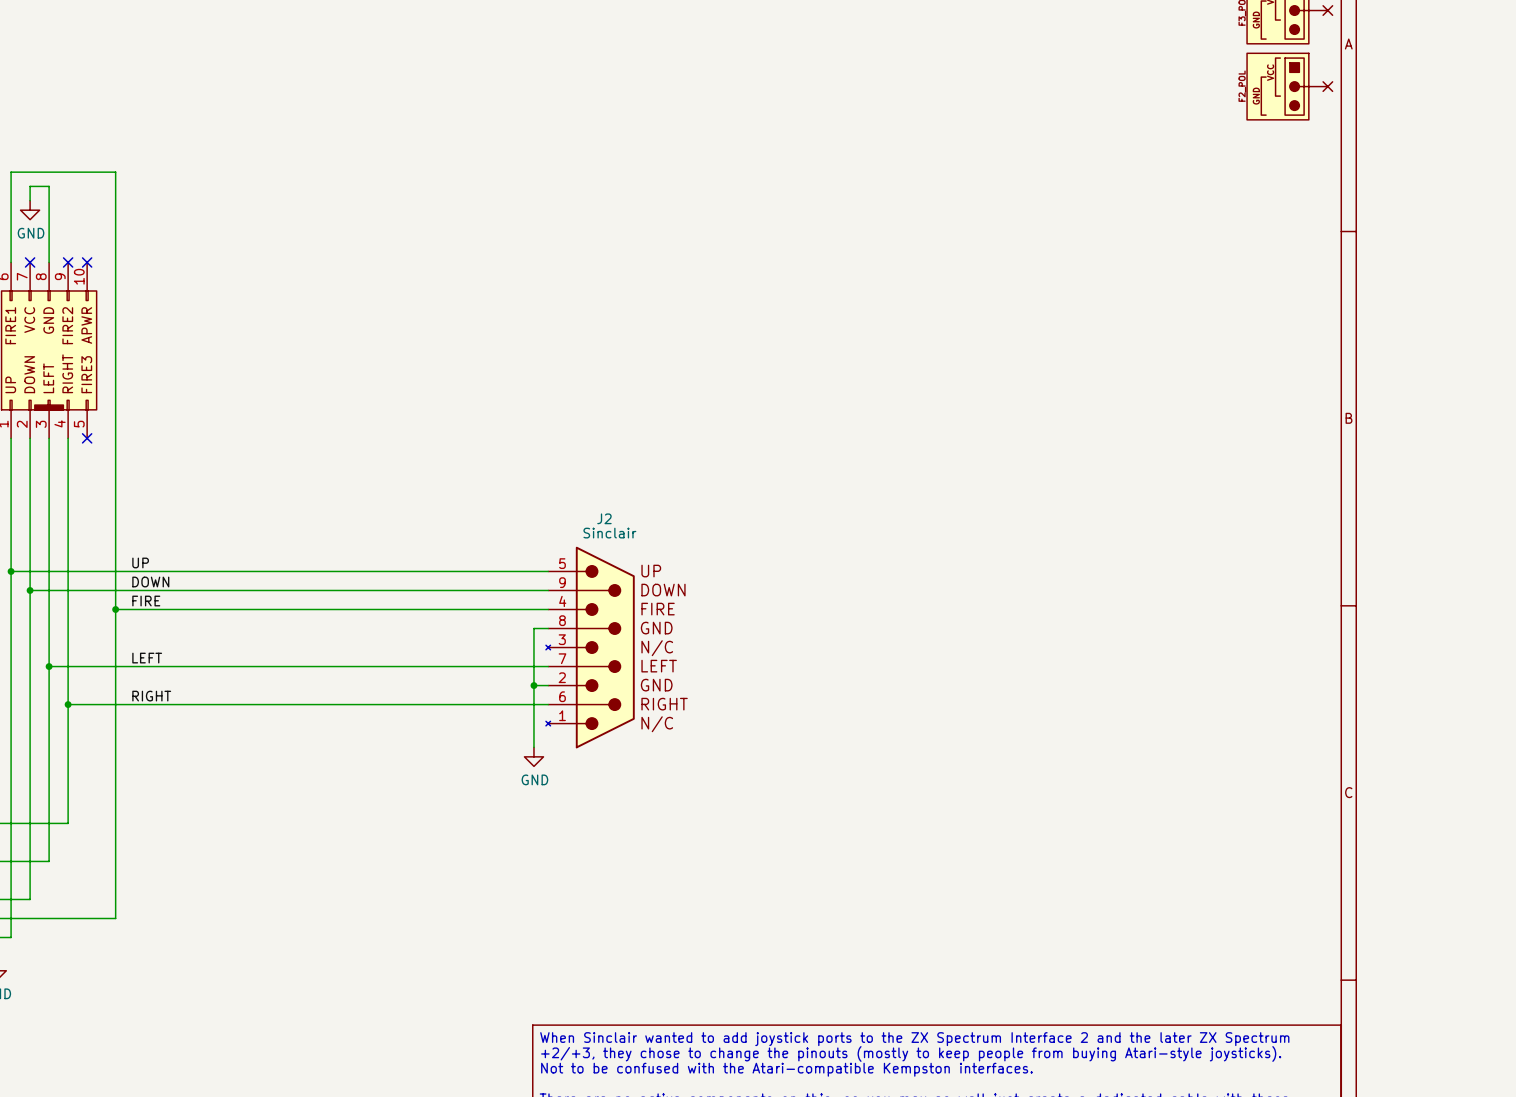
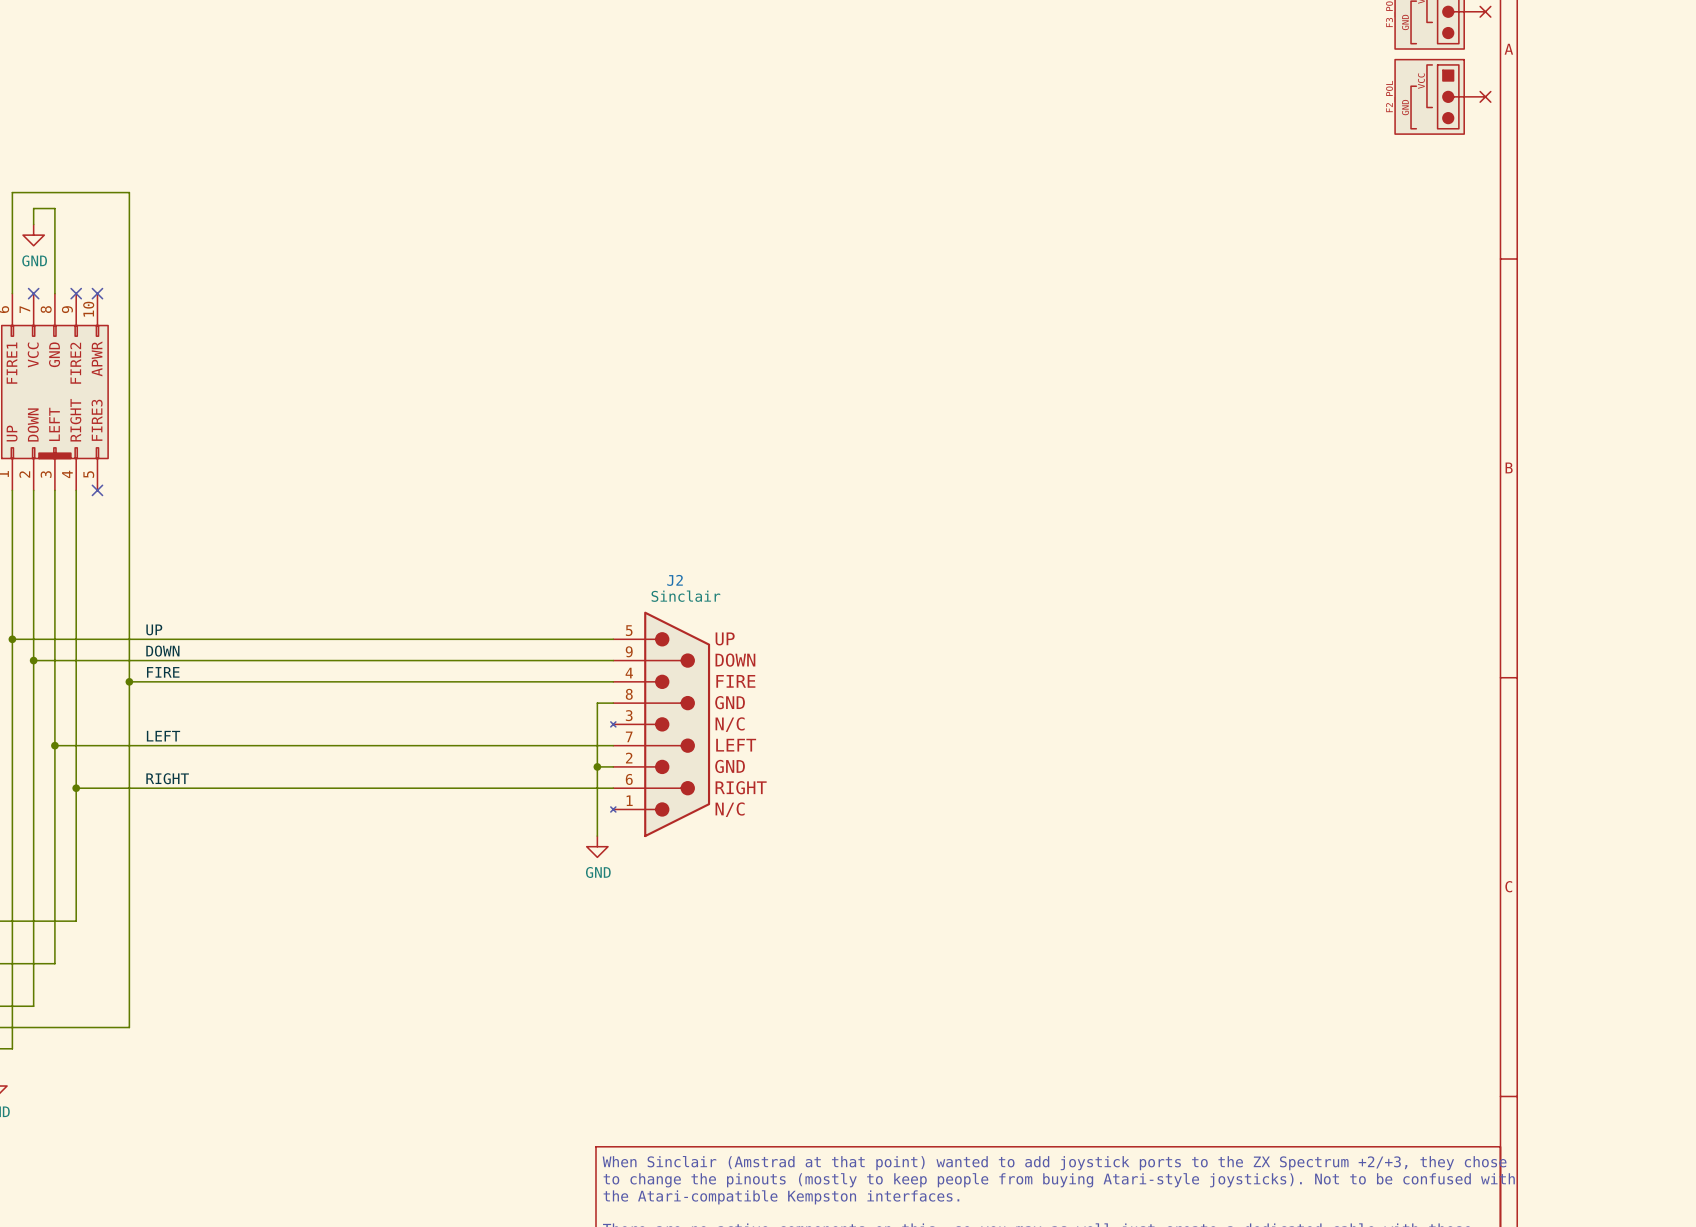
text: When Sinclair wanted to add joystick ports to the ZX Spectrum Interface 2 and the later ZX Spectrum (914, 1039) -> When Sinclair (Amstrad at that point) wanted to add joystick ports to the ZX Spectrum +2/+3, they chose (1054, 1163)
text: +2/+3, they chose to change the pinouts (mostly to keep people from buying Atari-style joysticks). (911, 1053) -> to change the pinouts (mostly to keep people from buying Atari-style joysticks). Not to be confused with (1059, 1180)
text: Not to be confused with the Atari-compatible Kempston interfaces. (786, 1069) -> the Atari-compatible Kempston interfaces. (781, 1197)

